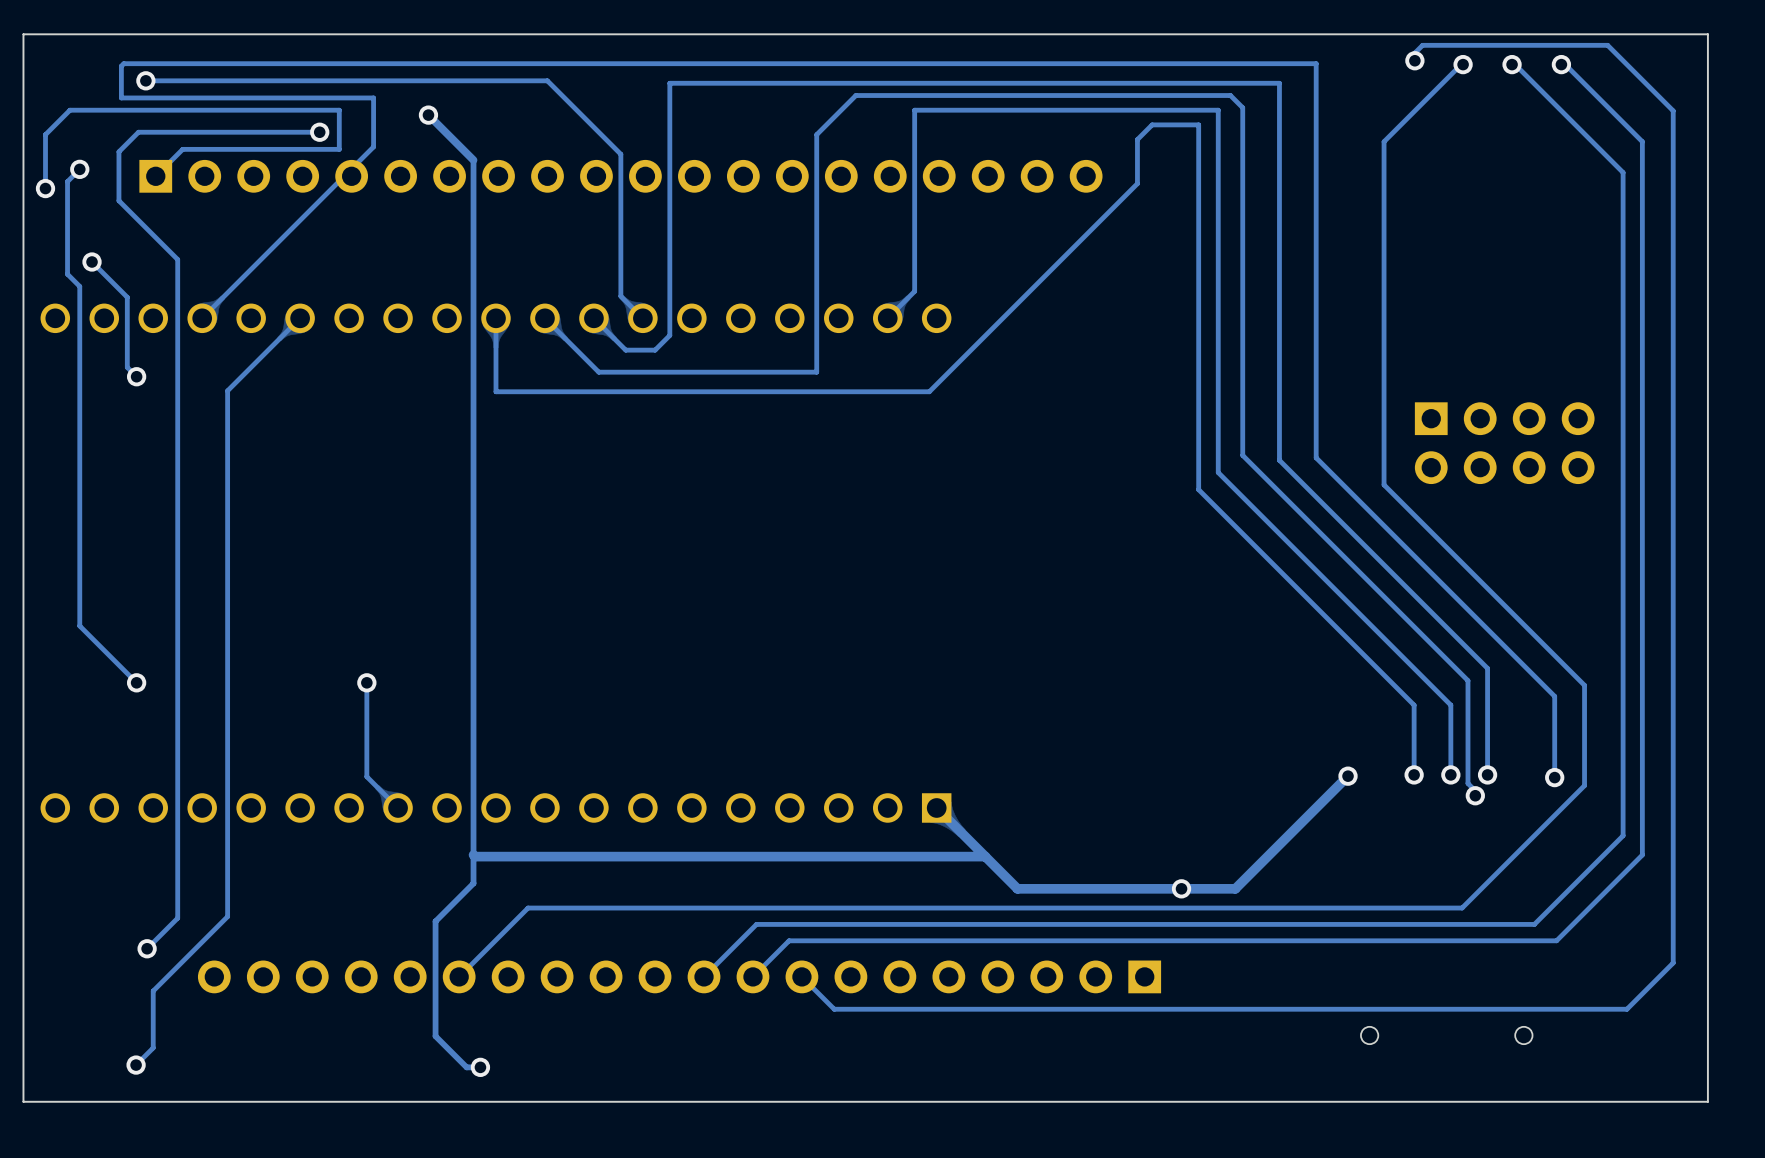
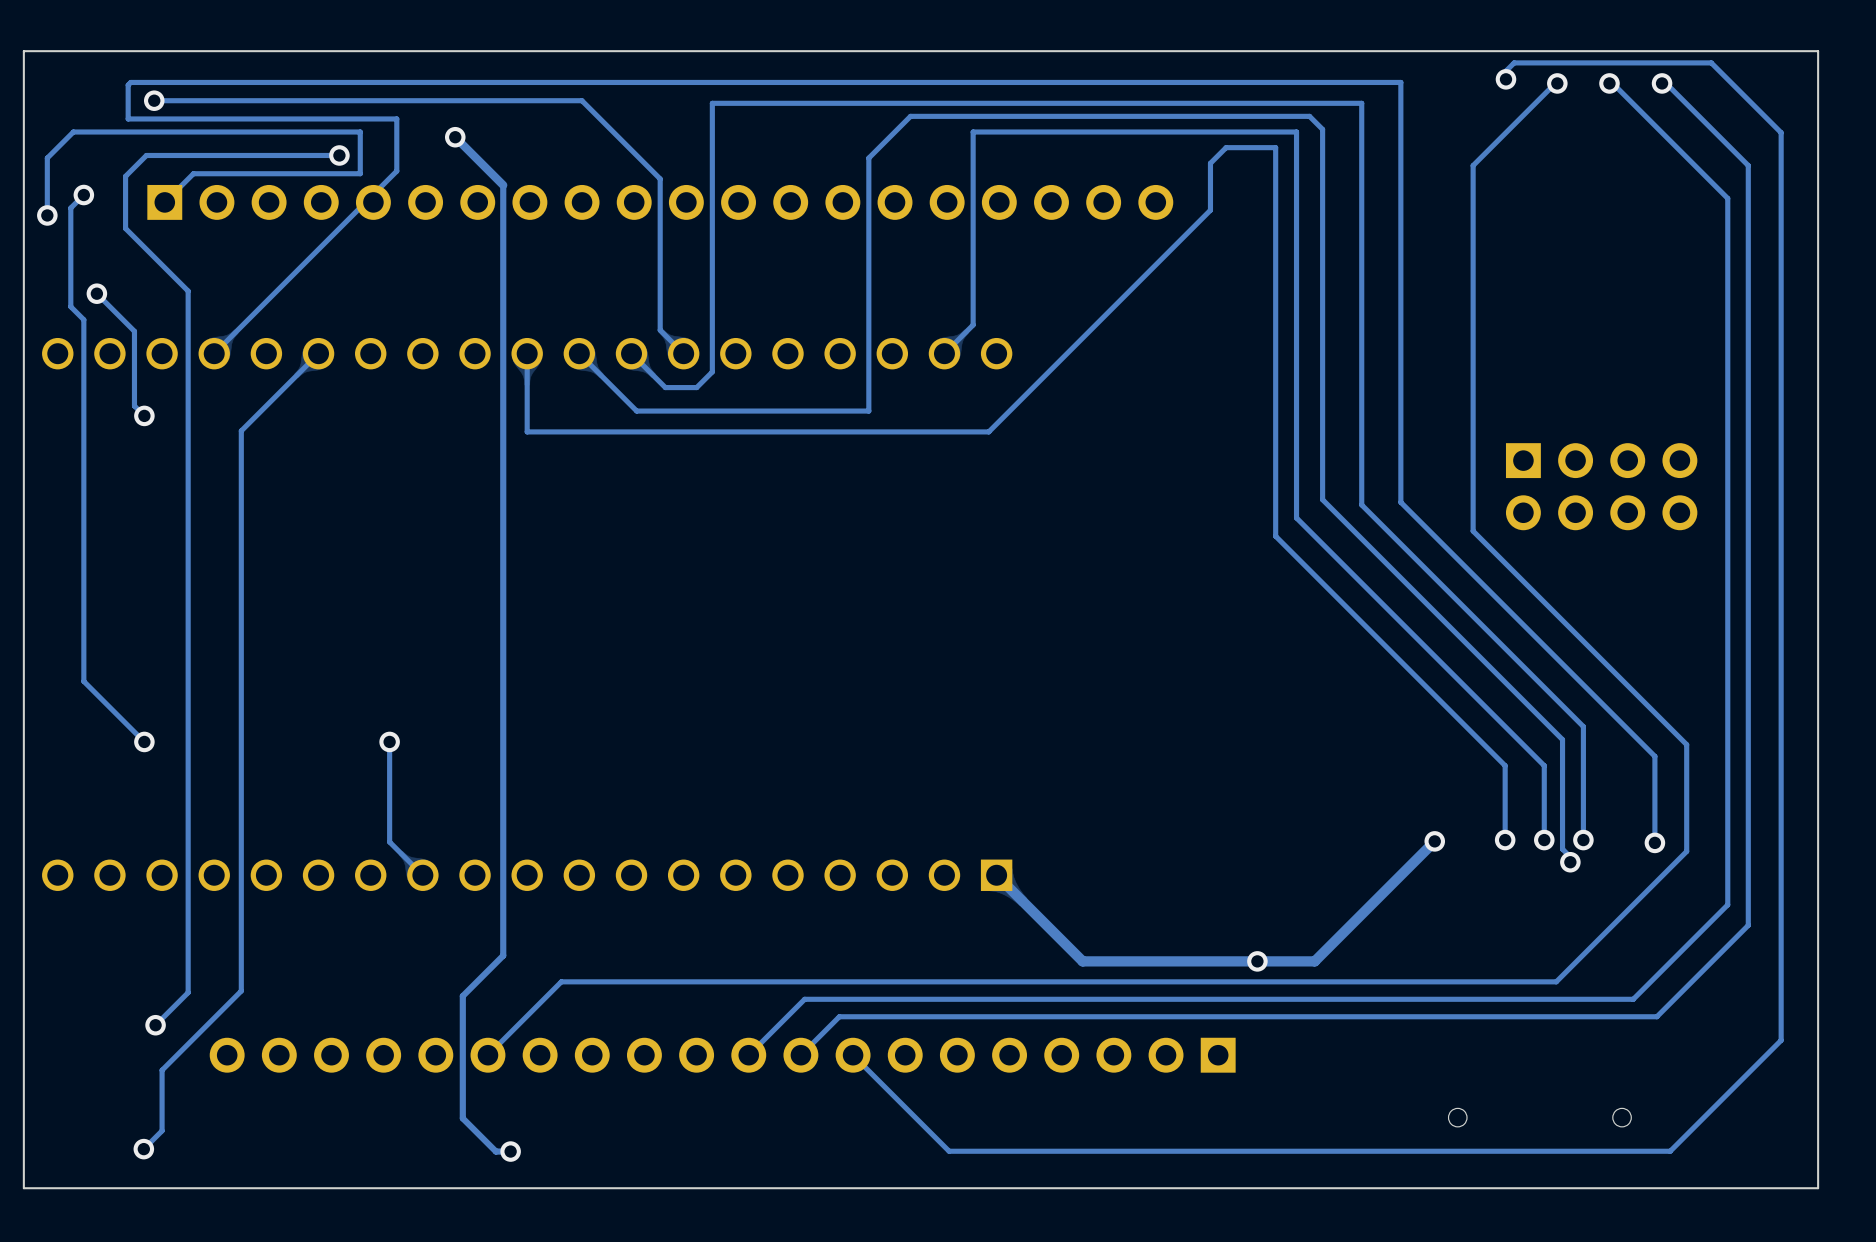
track: (473, 855) (475, 856) (985, 856) -> none
track: (1626, 1009) (834, 1009) -> (1731, 1089) (1670, 1151) (949, 1151) (887, 1089)

